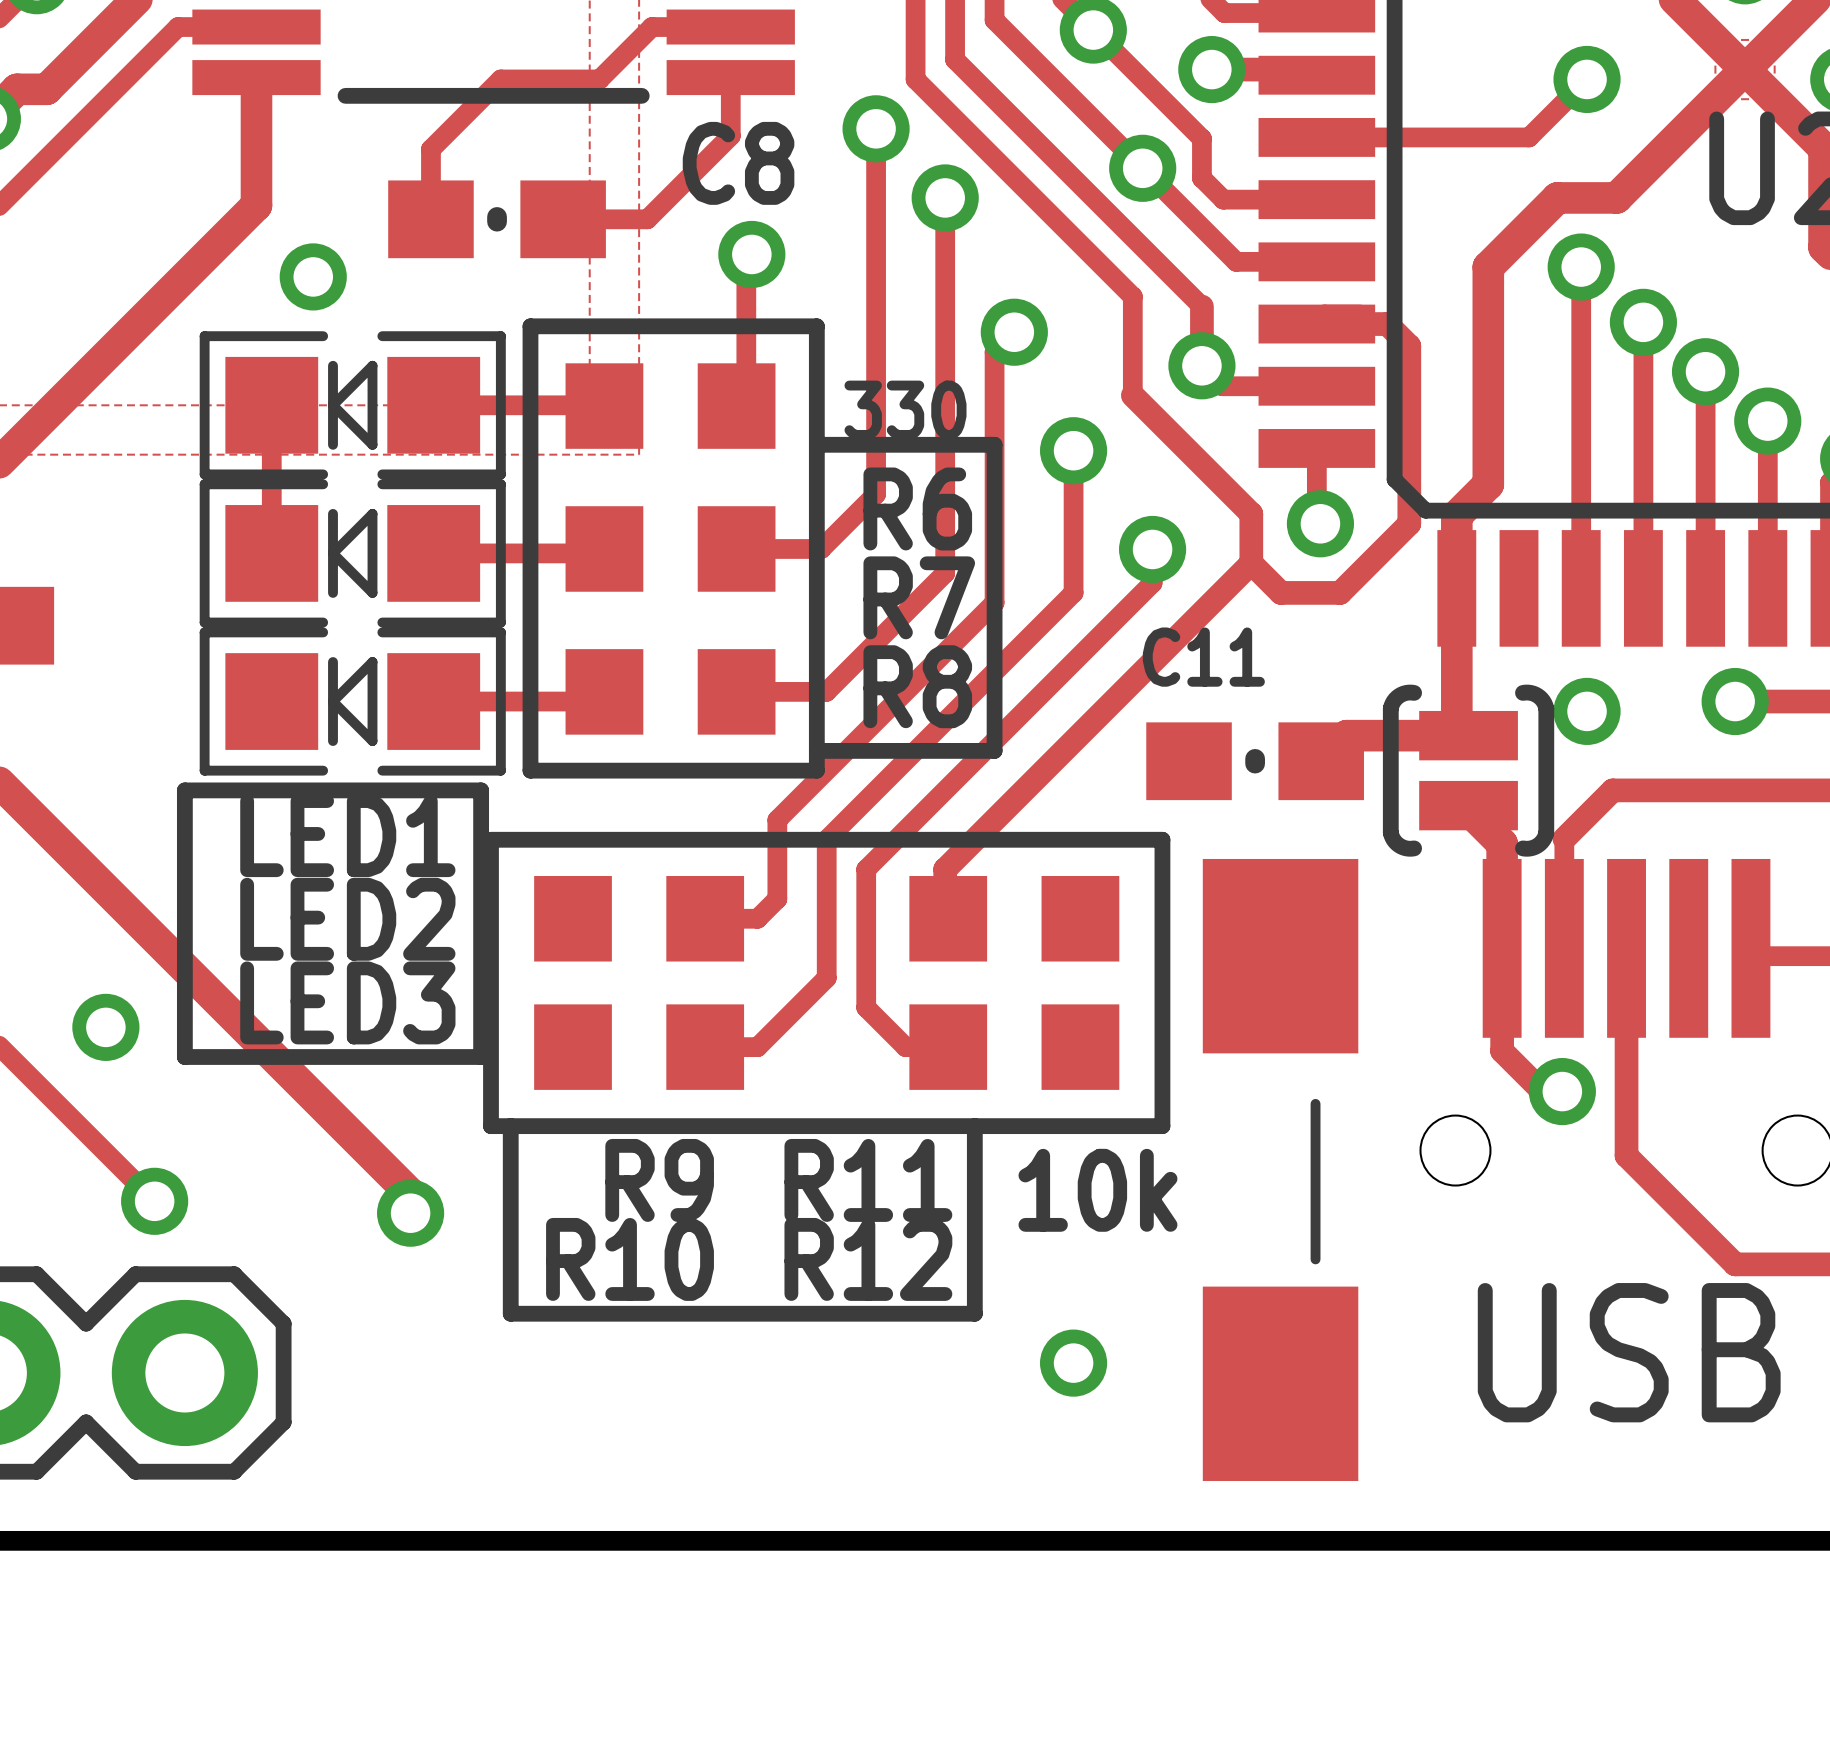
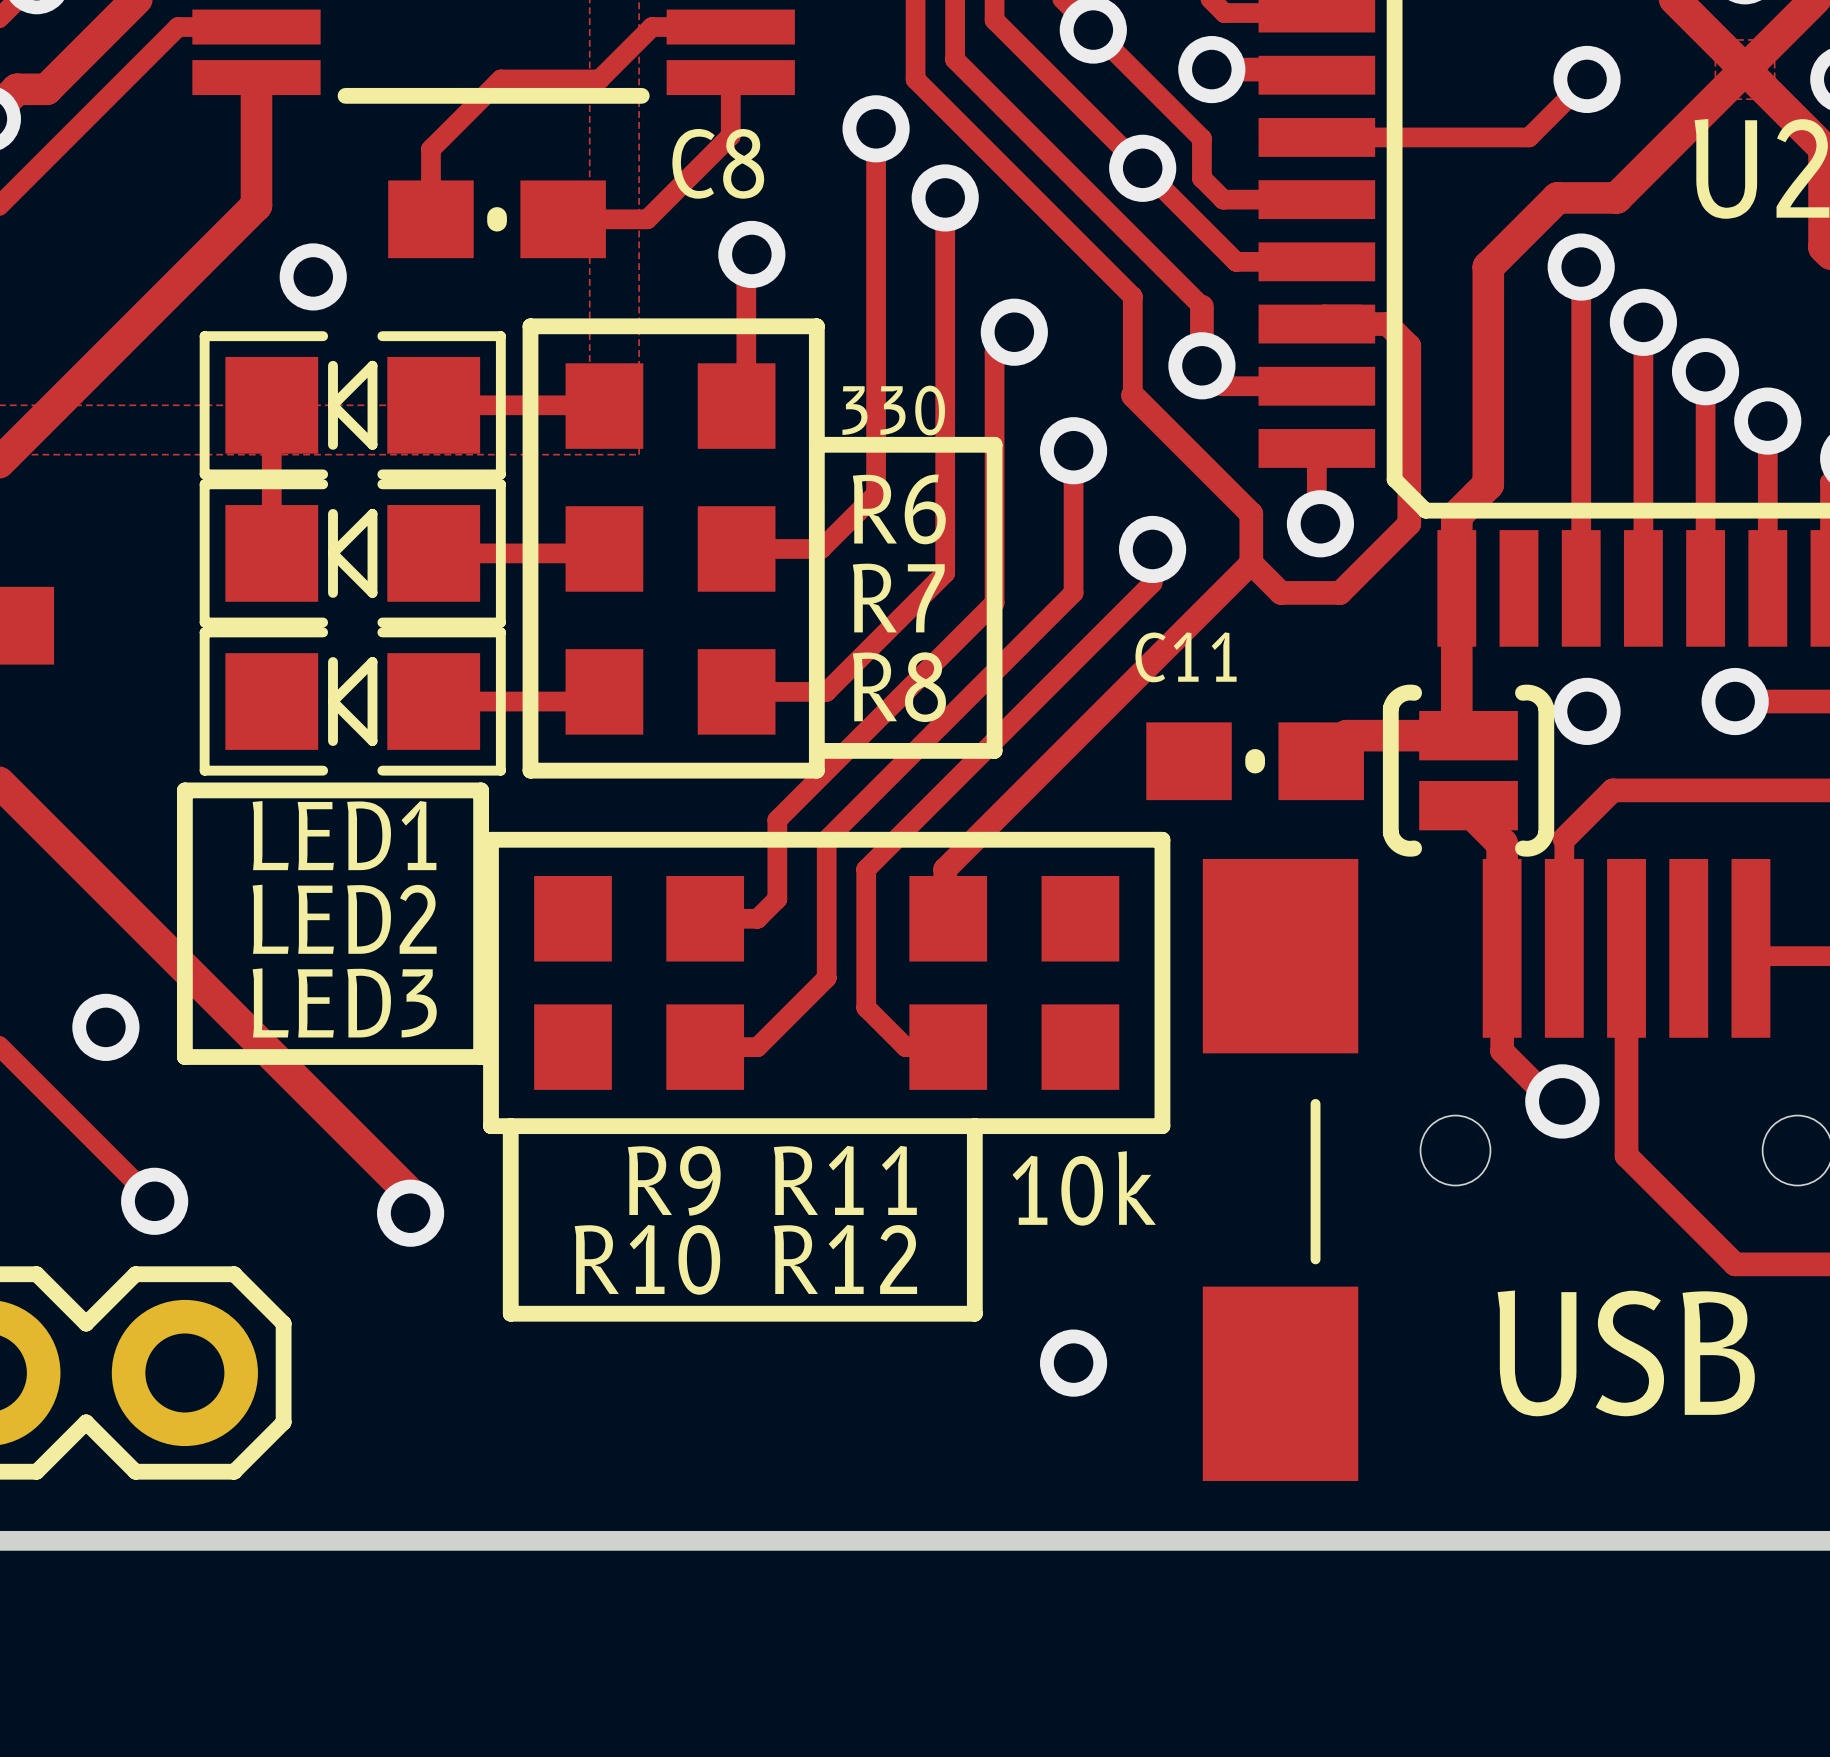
via size: [1528, 1057, 1596, 1126] -> [1525, 1064, 1600, 1139]

